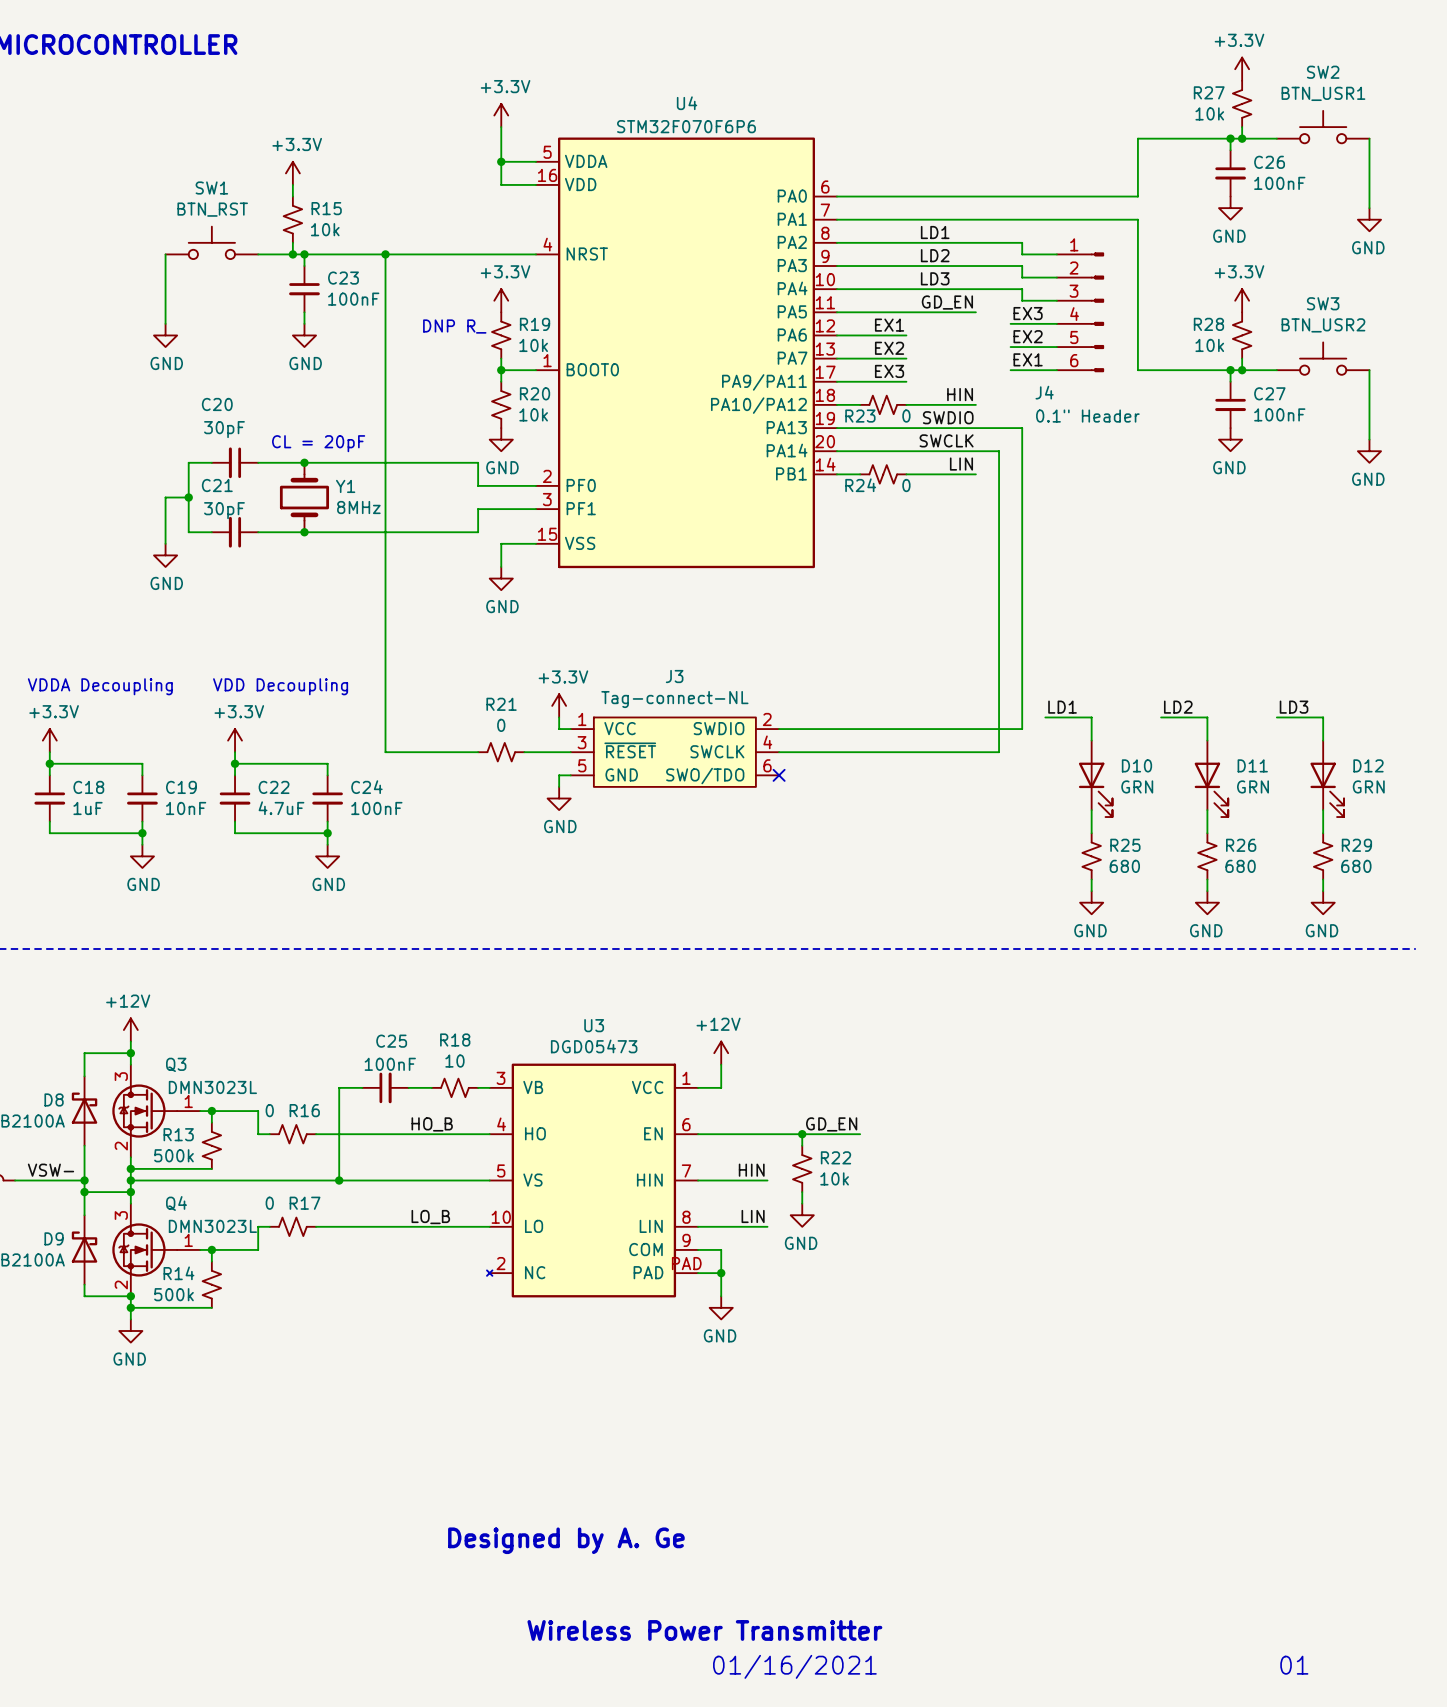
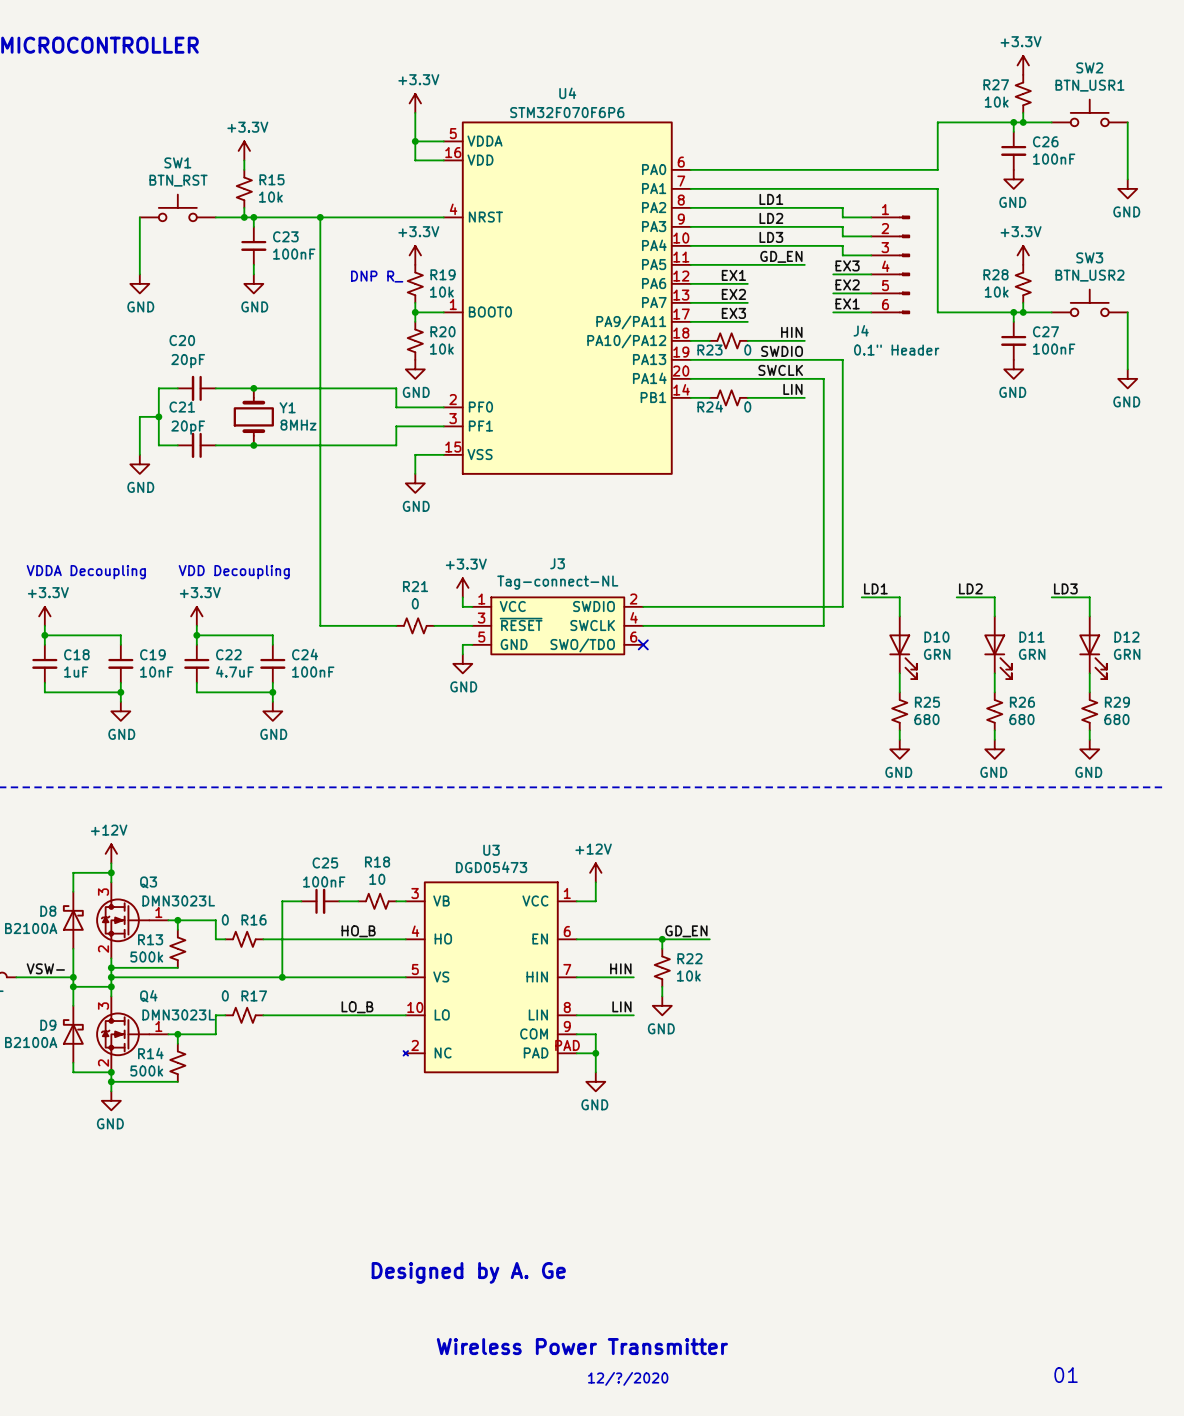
C20 value: 30pF (224, 429) -> 20pF (188, 361)
text: CL = 20pF (318, 443) -> none
C21 value: 30pF (224, 510) -> 20pF (188, 427)
text: 01/16/2021 (794, 1666) -> 12/?/2020 (628, 1378)

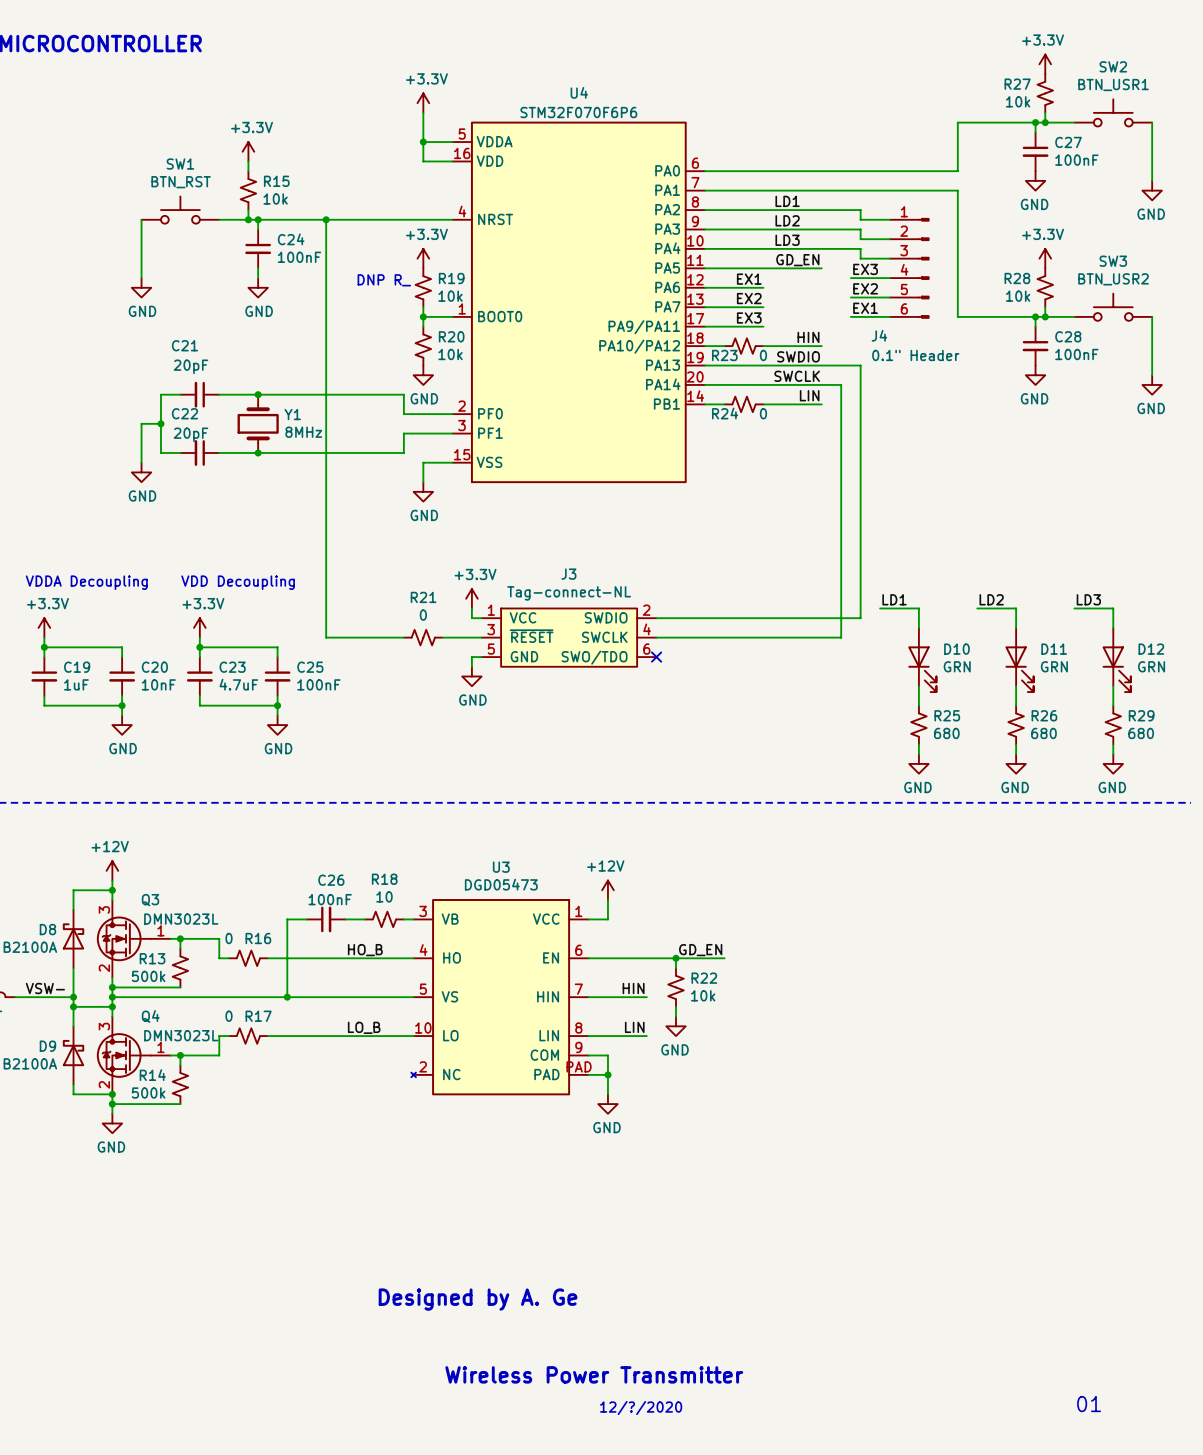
C26 name: C26 (1045, 141) -> C27 (1068, 142)
C23 name: C23 (285, 236) -> C24 (291, 239)
C27 name: C27 (1045, 331) -> C28 (1068, 336)
C20 name: C20 (182, 340) -> C21 (184, 345)
C21 name: C21 (182, 407) -> C22 (184, 413)
C18 name: C18 (76, 654) -> C19 (77, 667)
C19 name: C19 (152, 654) -> C20 (154, 667)
C22 name: C22 (228, 654) -> C23 (232, 667)
C24 name: C24 (305, 654) -> C25 (310, 667)
C25 name: C25 (325, 862) -> C26 (331, 880)

